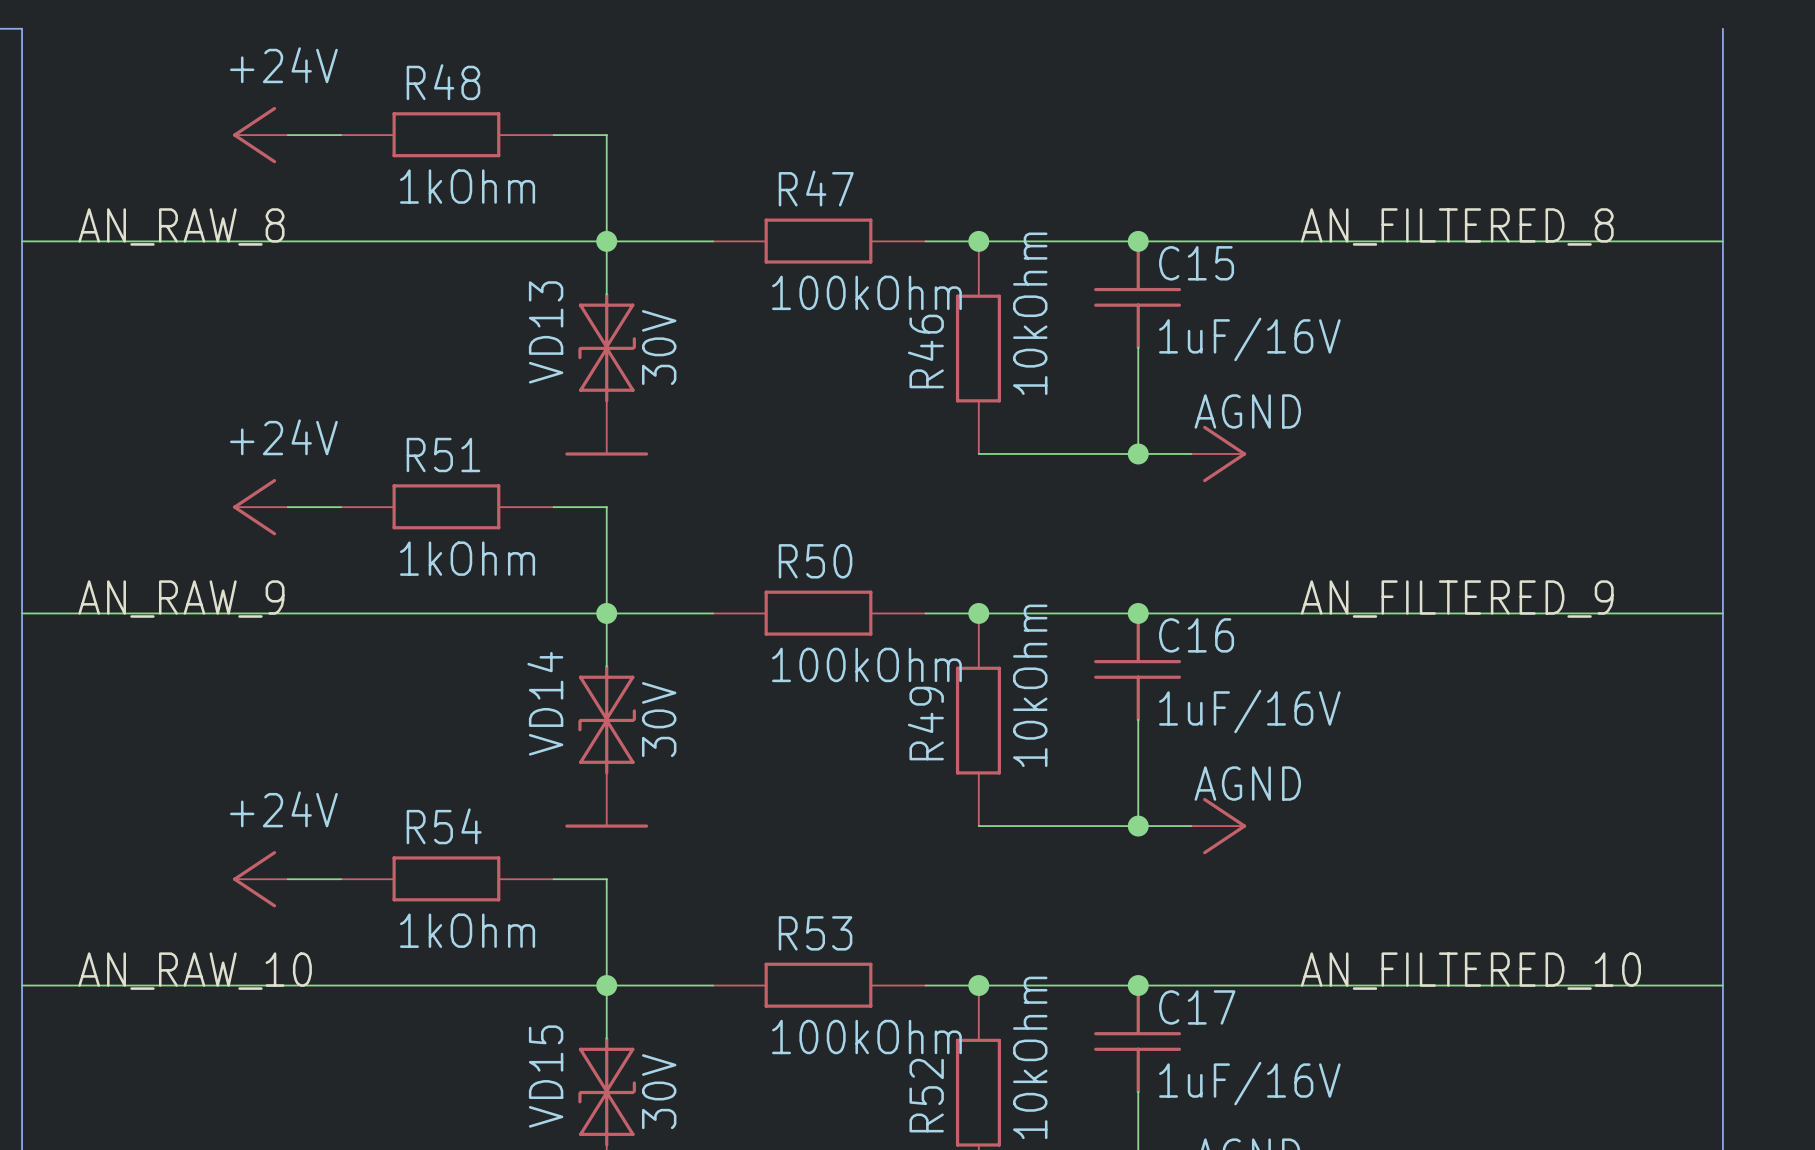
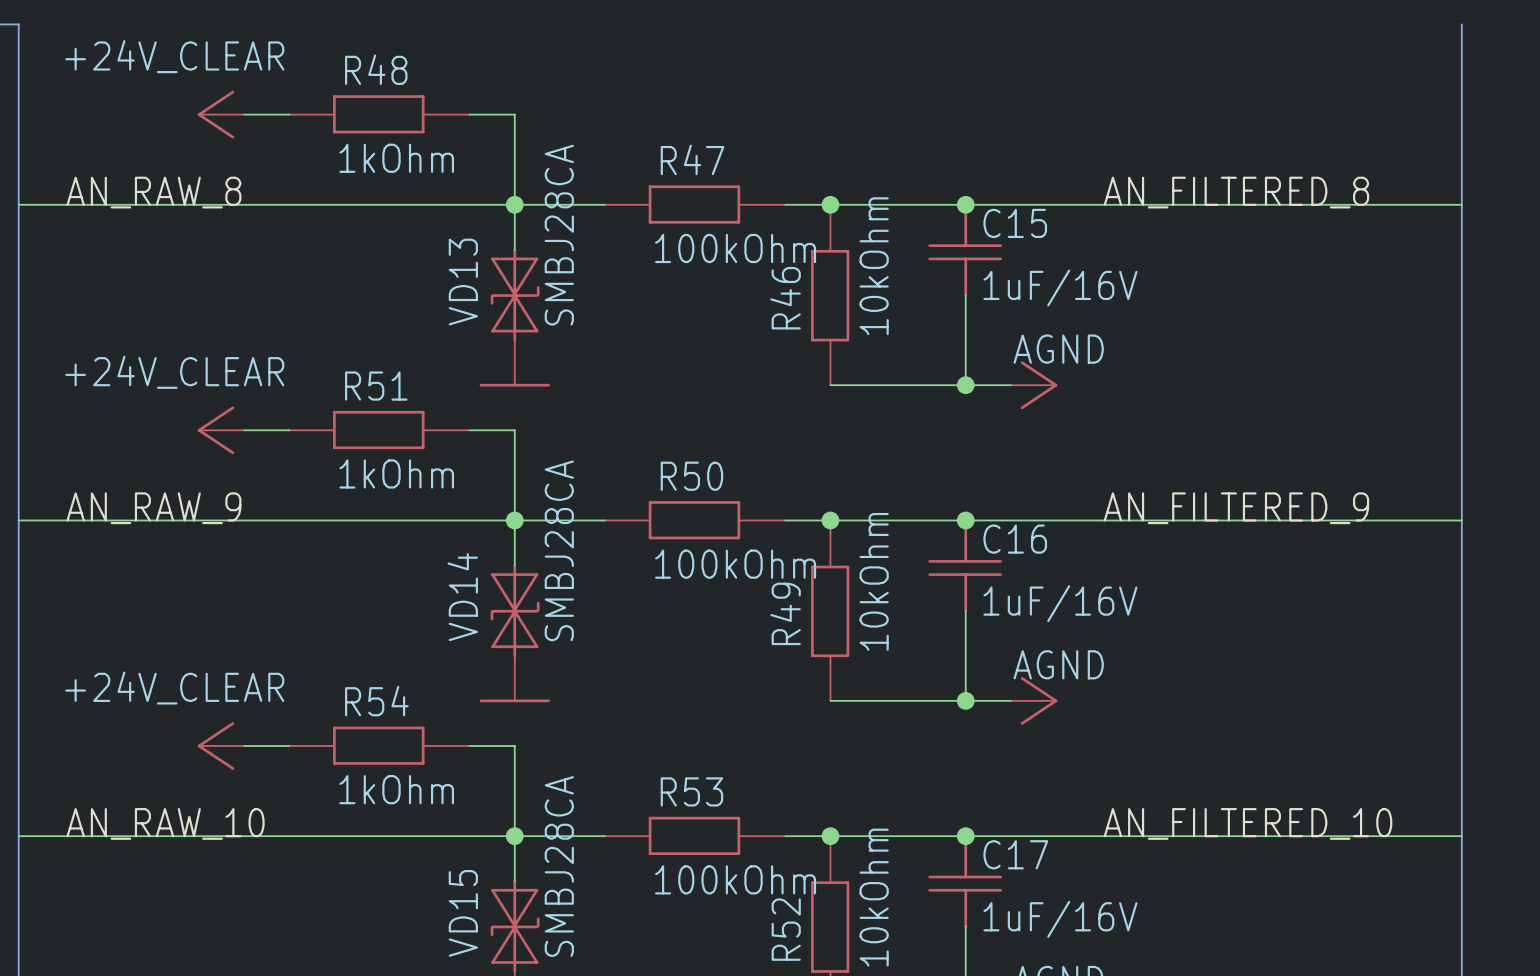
power symbol: +24V (260, 135) -> +24V_CLEAR (220, 114)
VD13 value: 30V (659, 347) -> SMBJ28CA (559, 235)
power symbol: +24V (260, 507) -> +24V_CLEAR (220, 430)
VD14 value: 30V (659, 719) -> SMBJ28CA (559, 550)
power symbol: +24V (260, 879) -> +24V_CLEAR (220, 745)
VD15 value: 30V (659, 1091) -> SMBJ28CA (559, 866)

